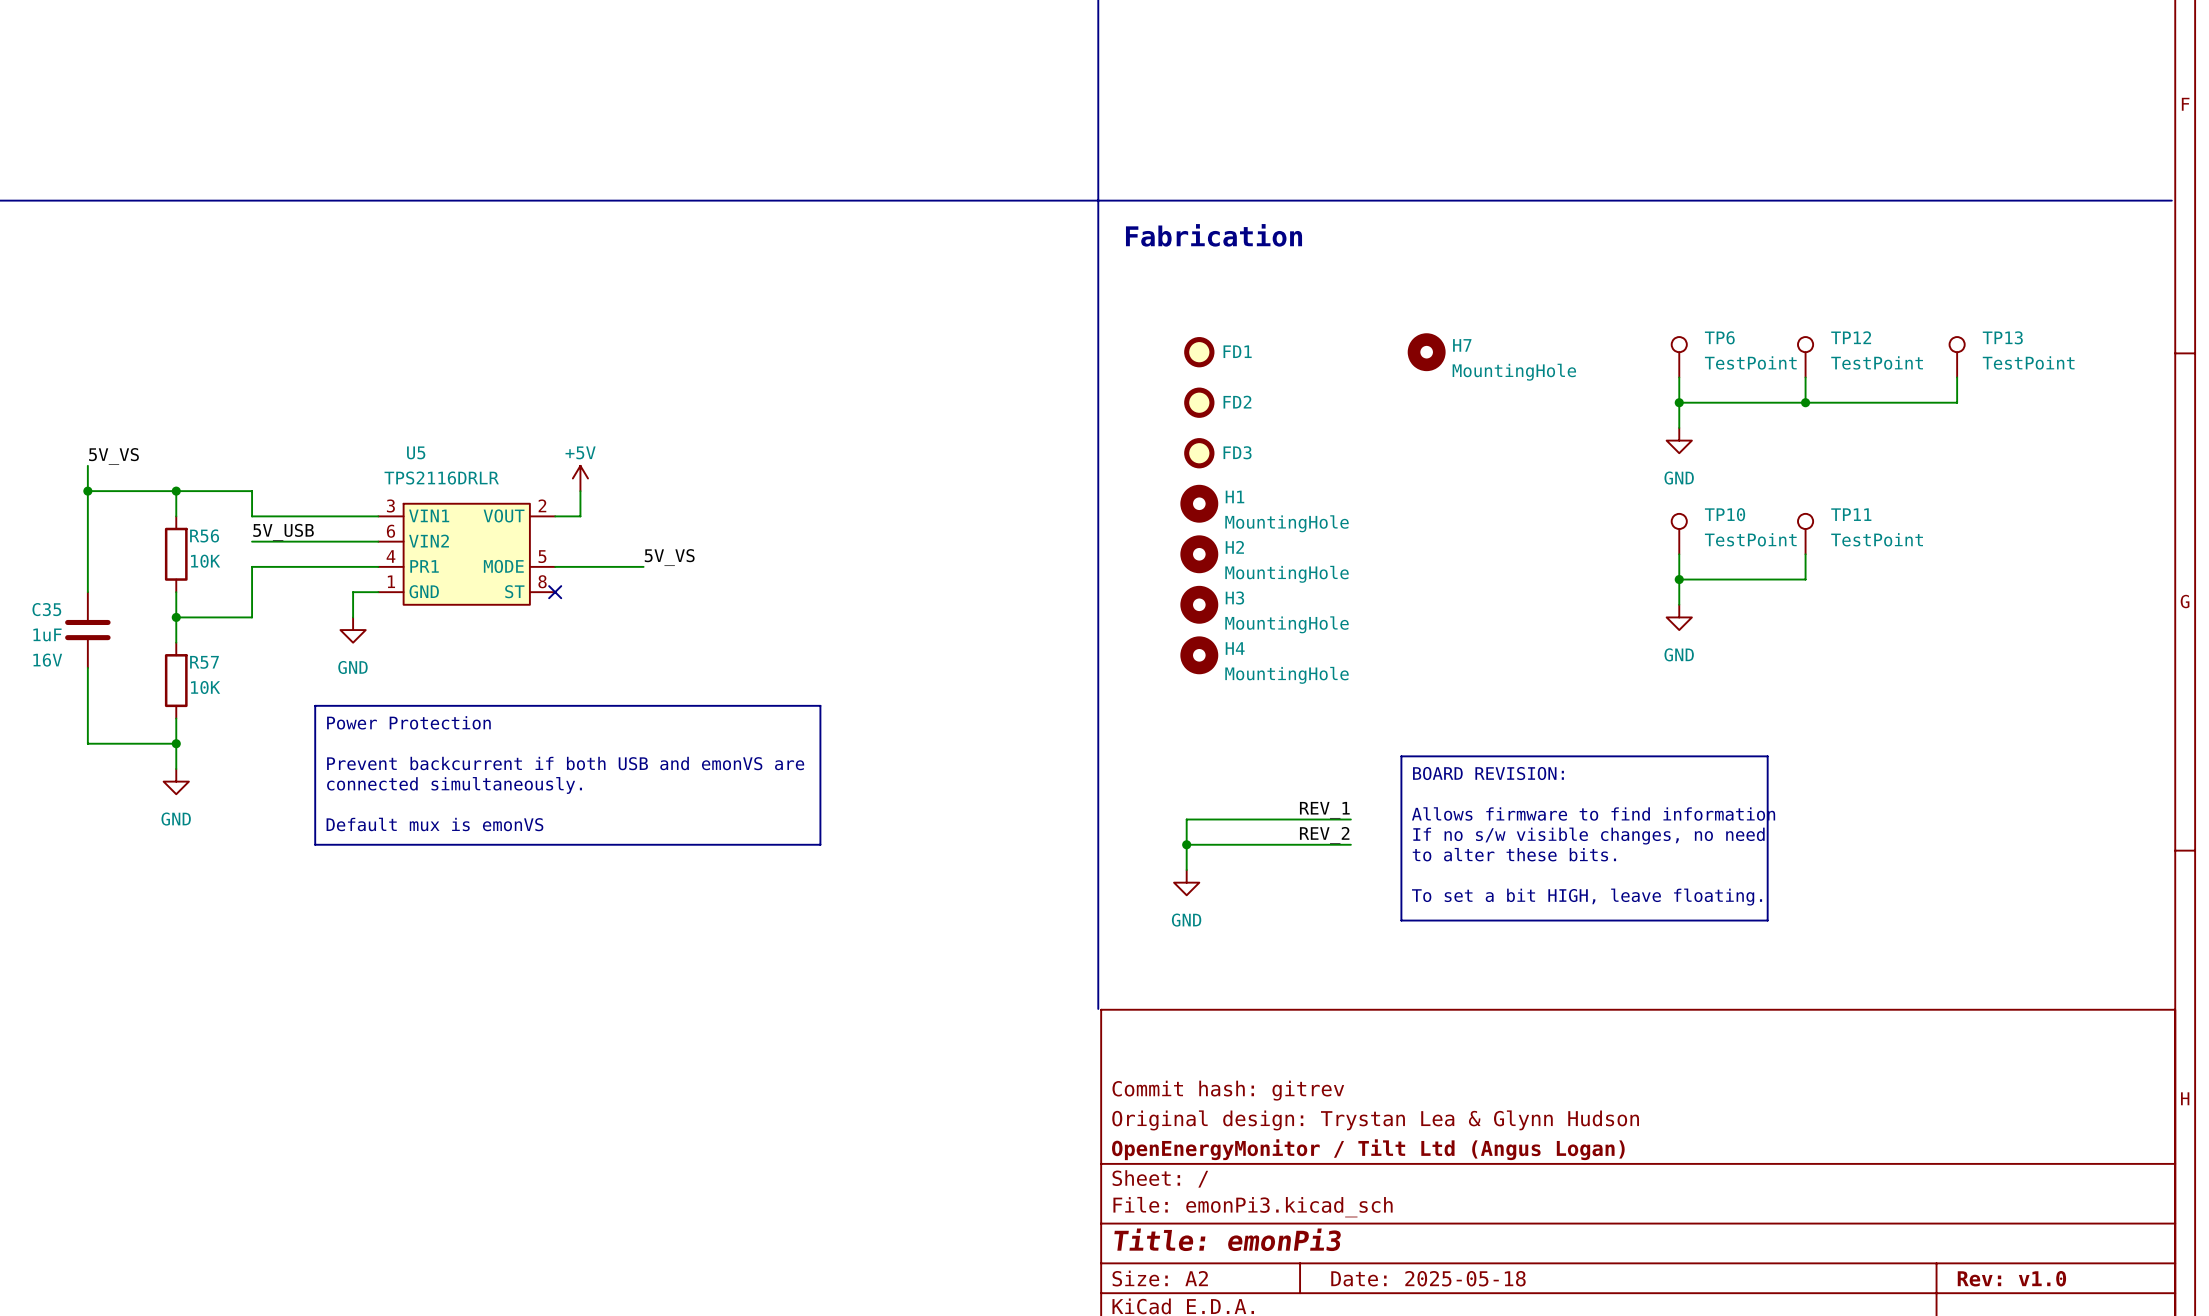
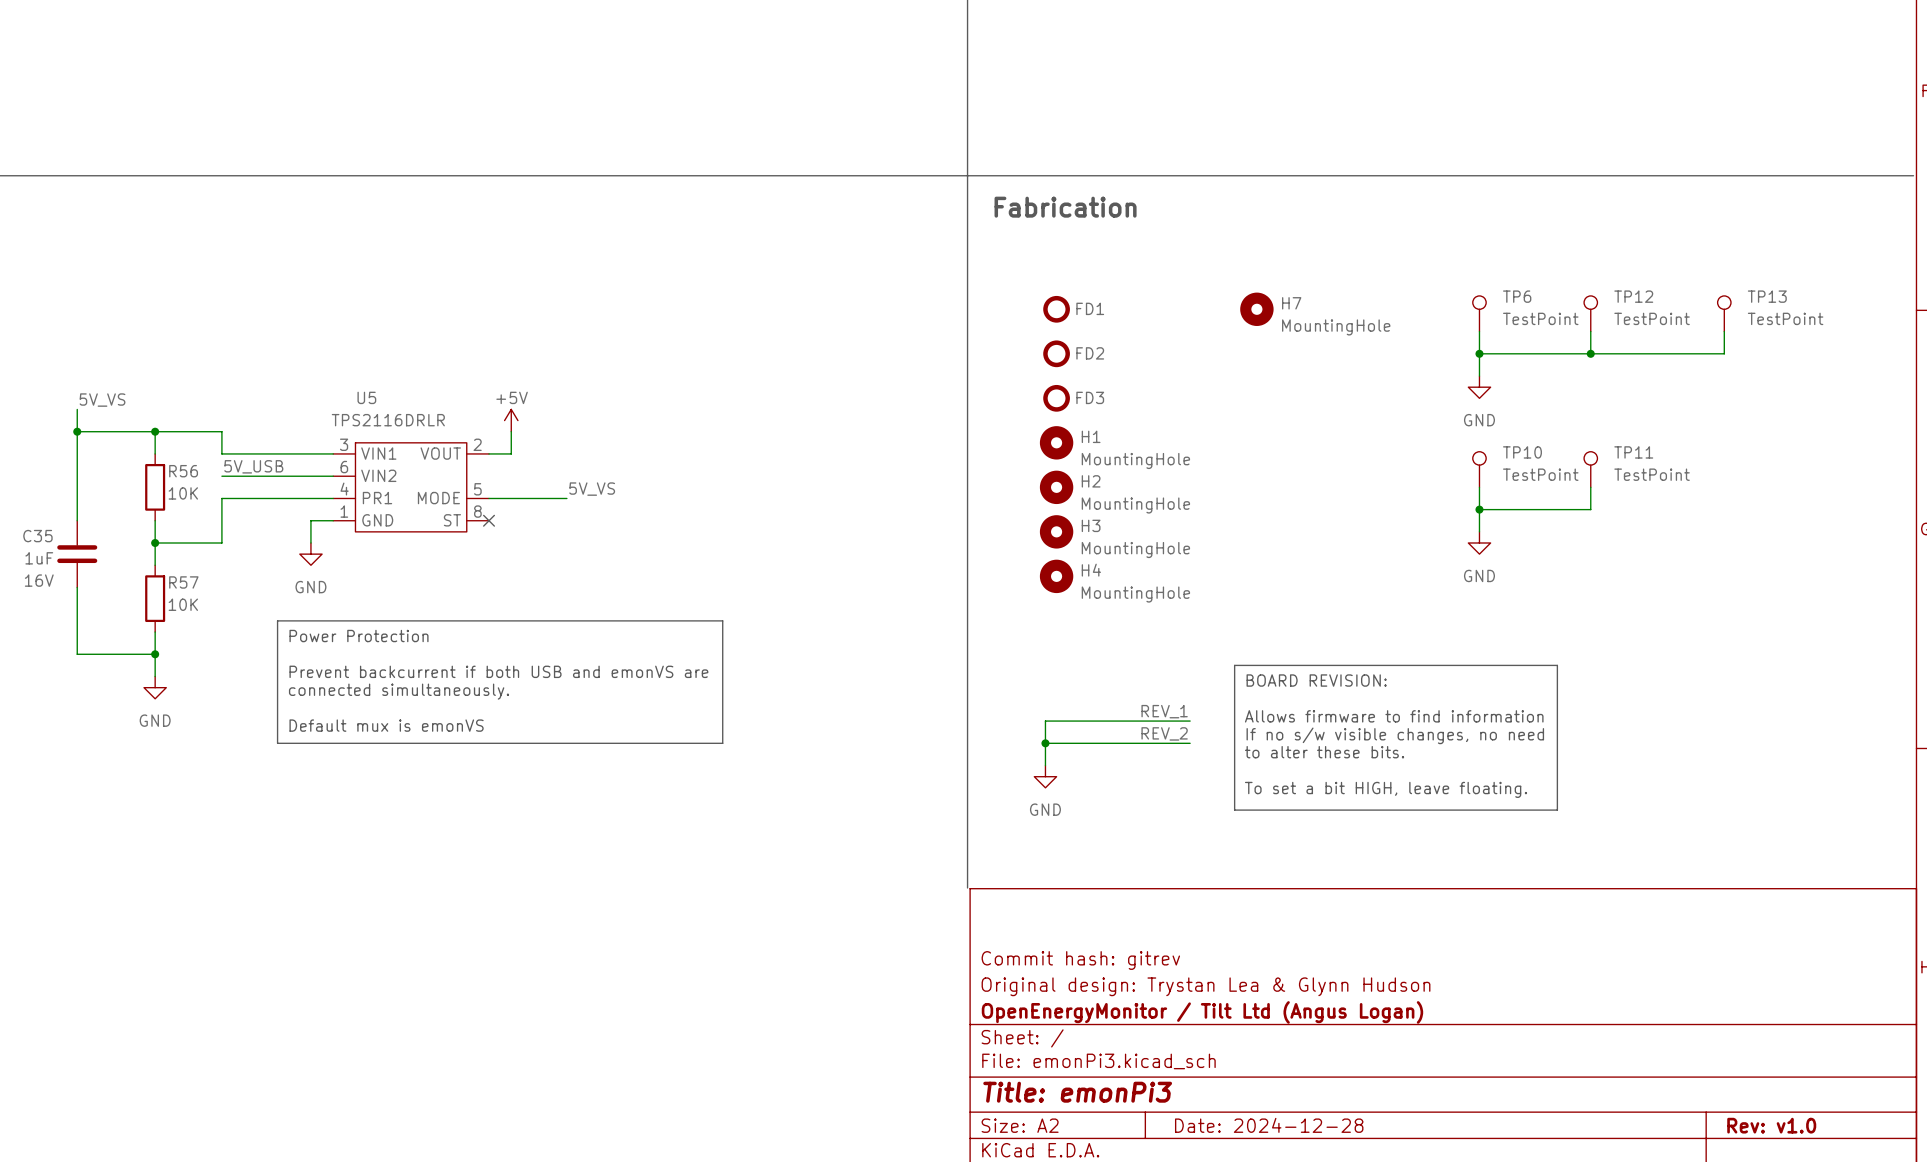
title block: Date: 2025-05-18 (1428, 1278) -> Date: 2024-12-28 (1269, 1125)

